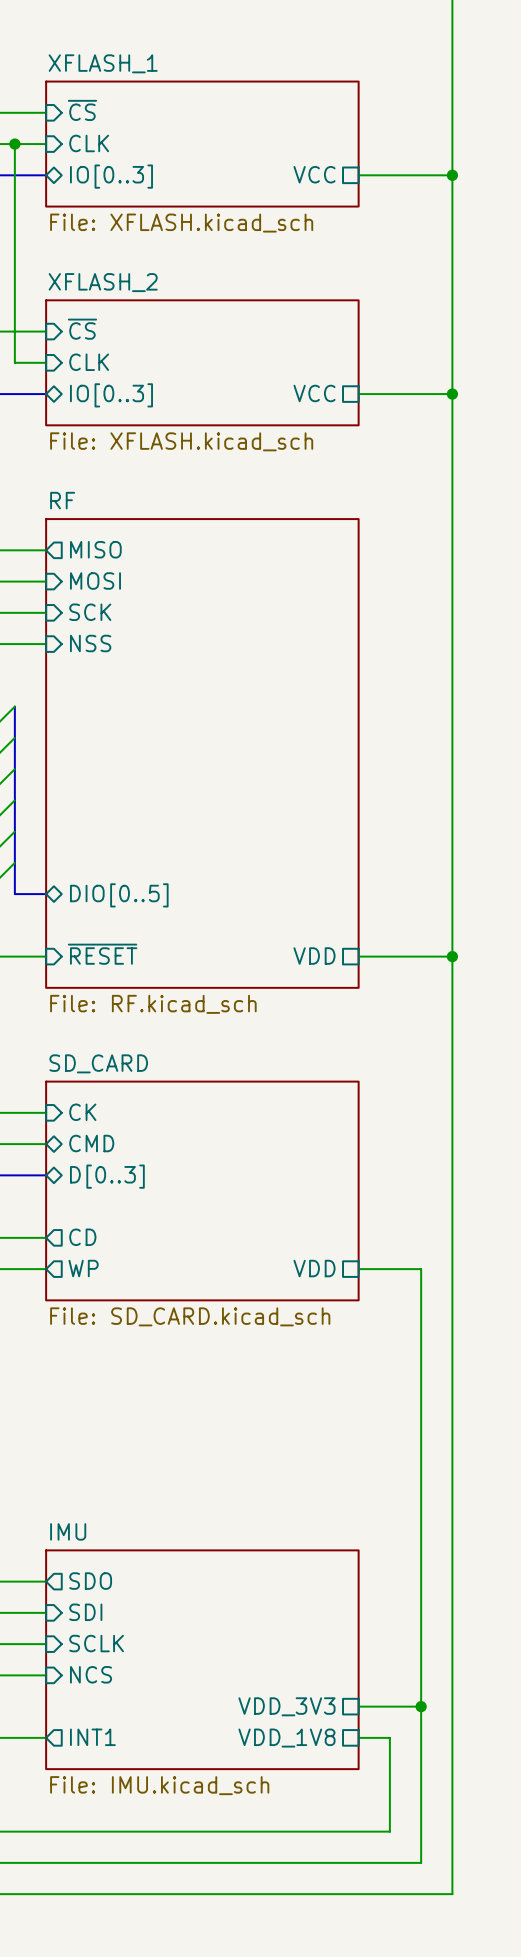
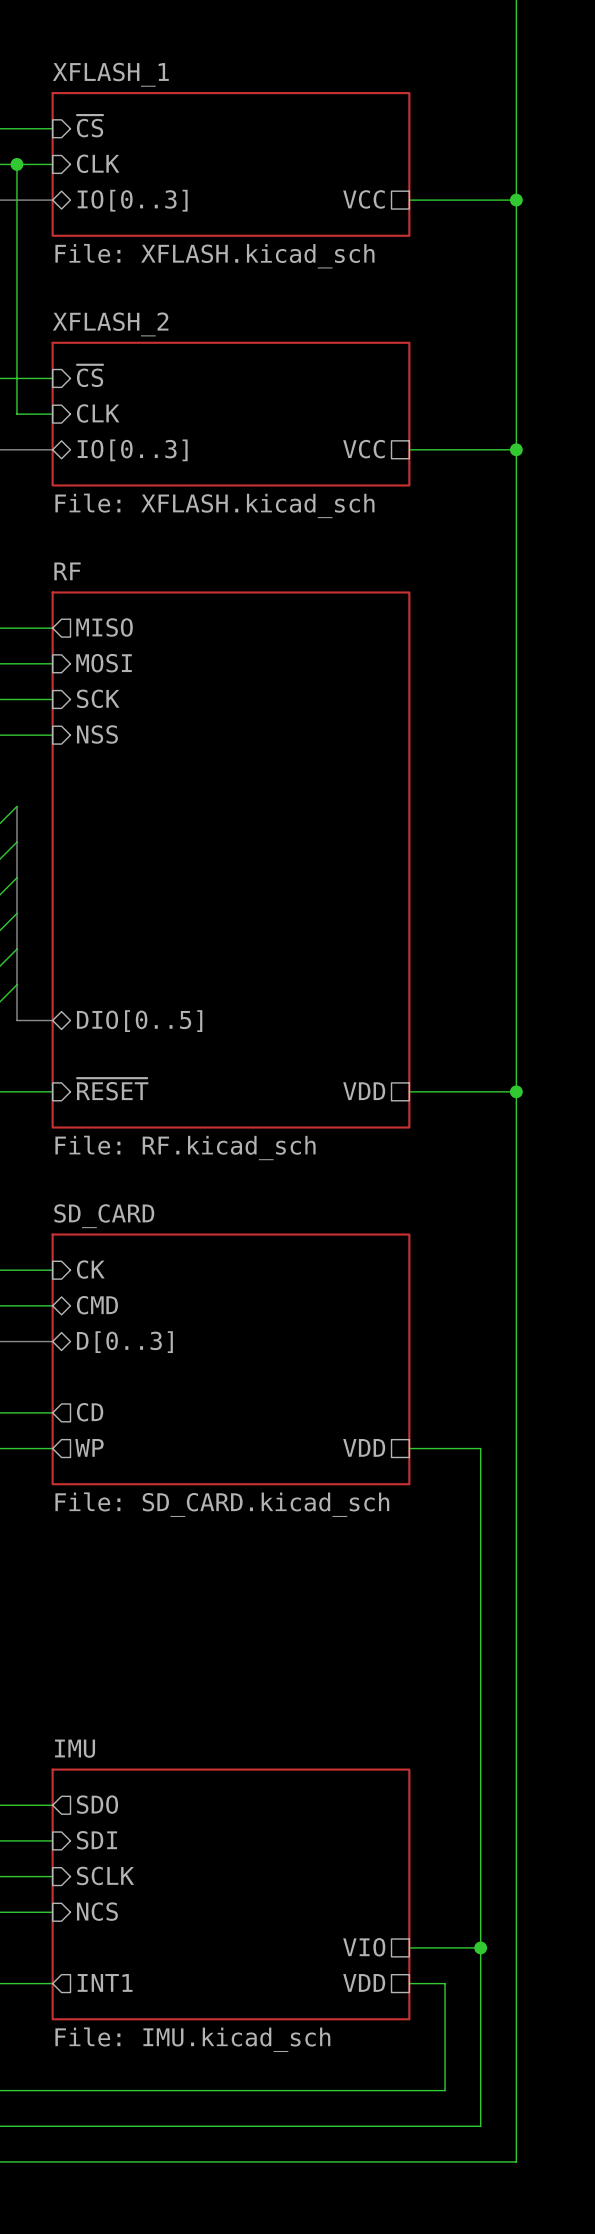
sheet pin: VDD_3V3 (286, 1706) -> VIO (364, 1947)
sheet pin: VDD_1V8 (286, 1738) -> VDD (364, 1982)

